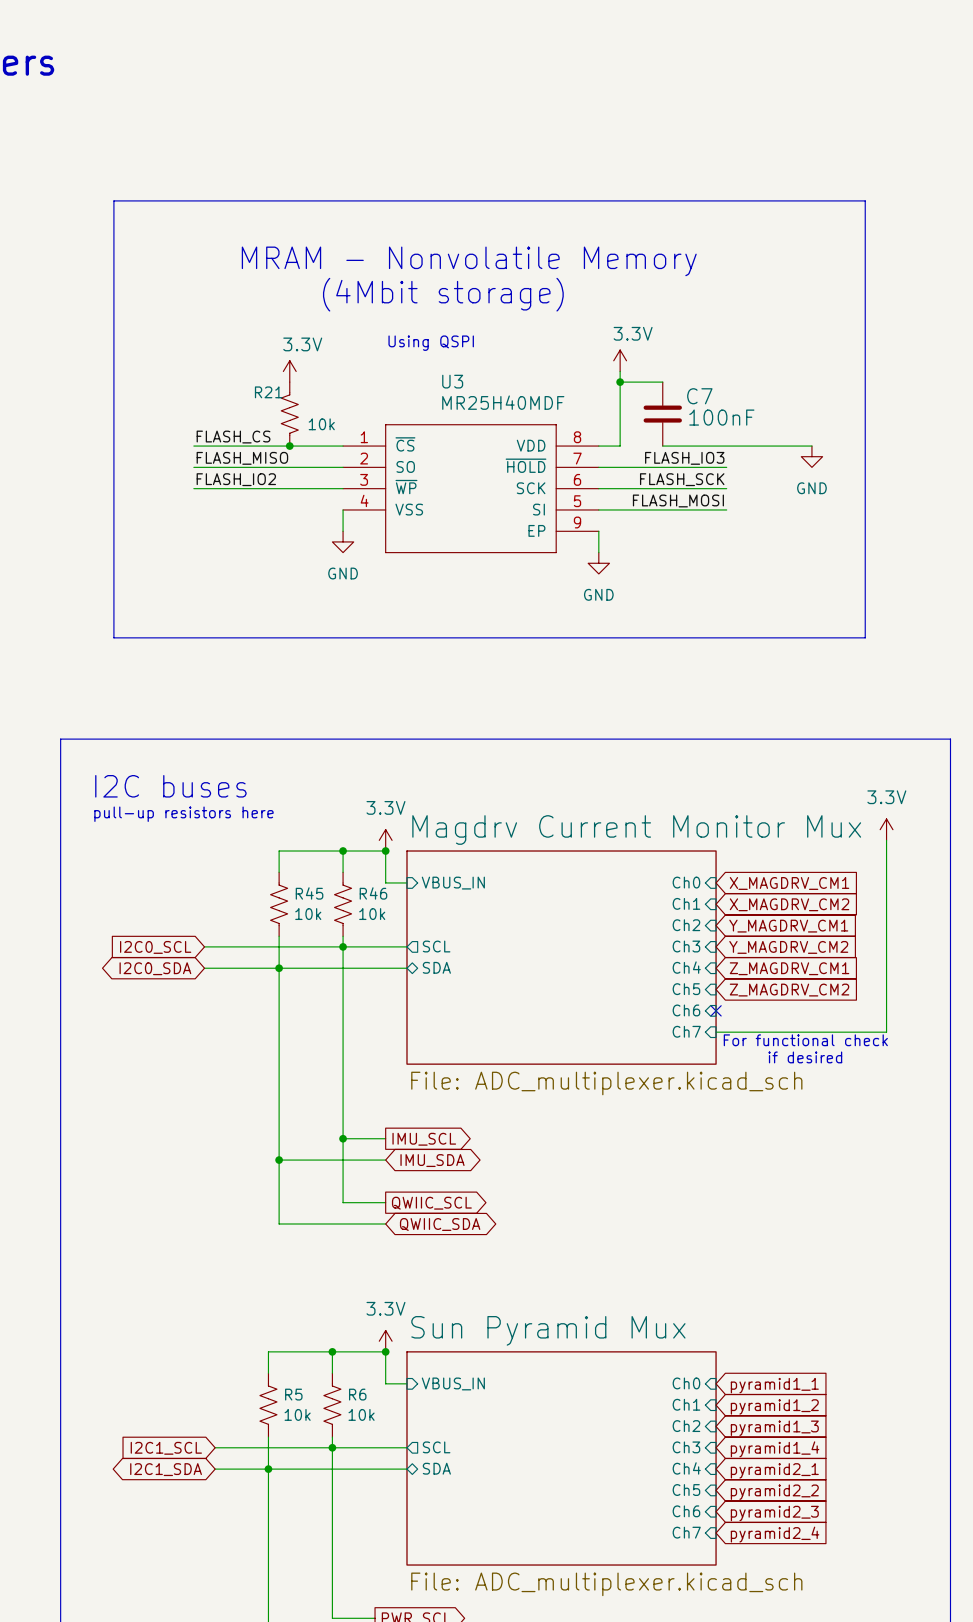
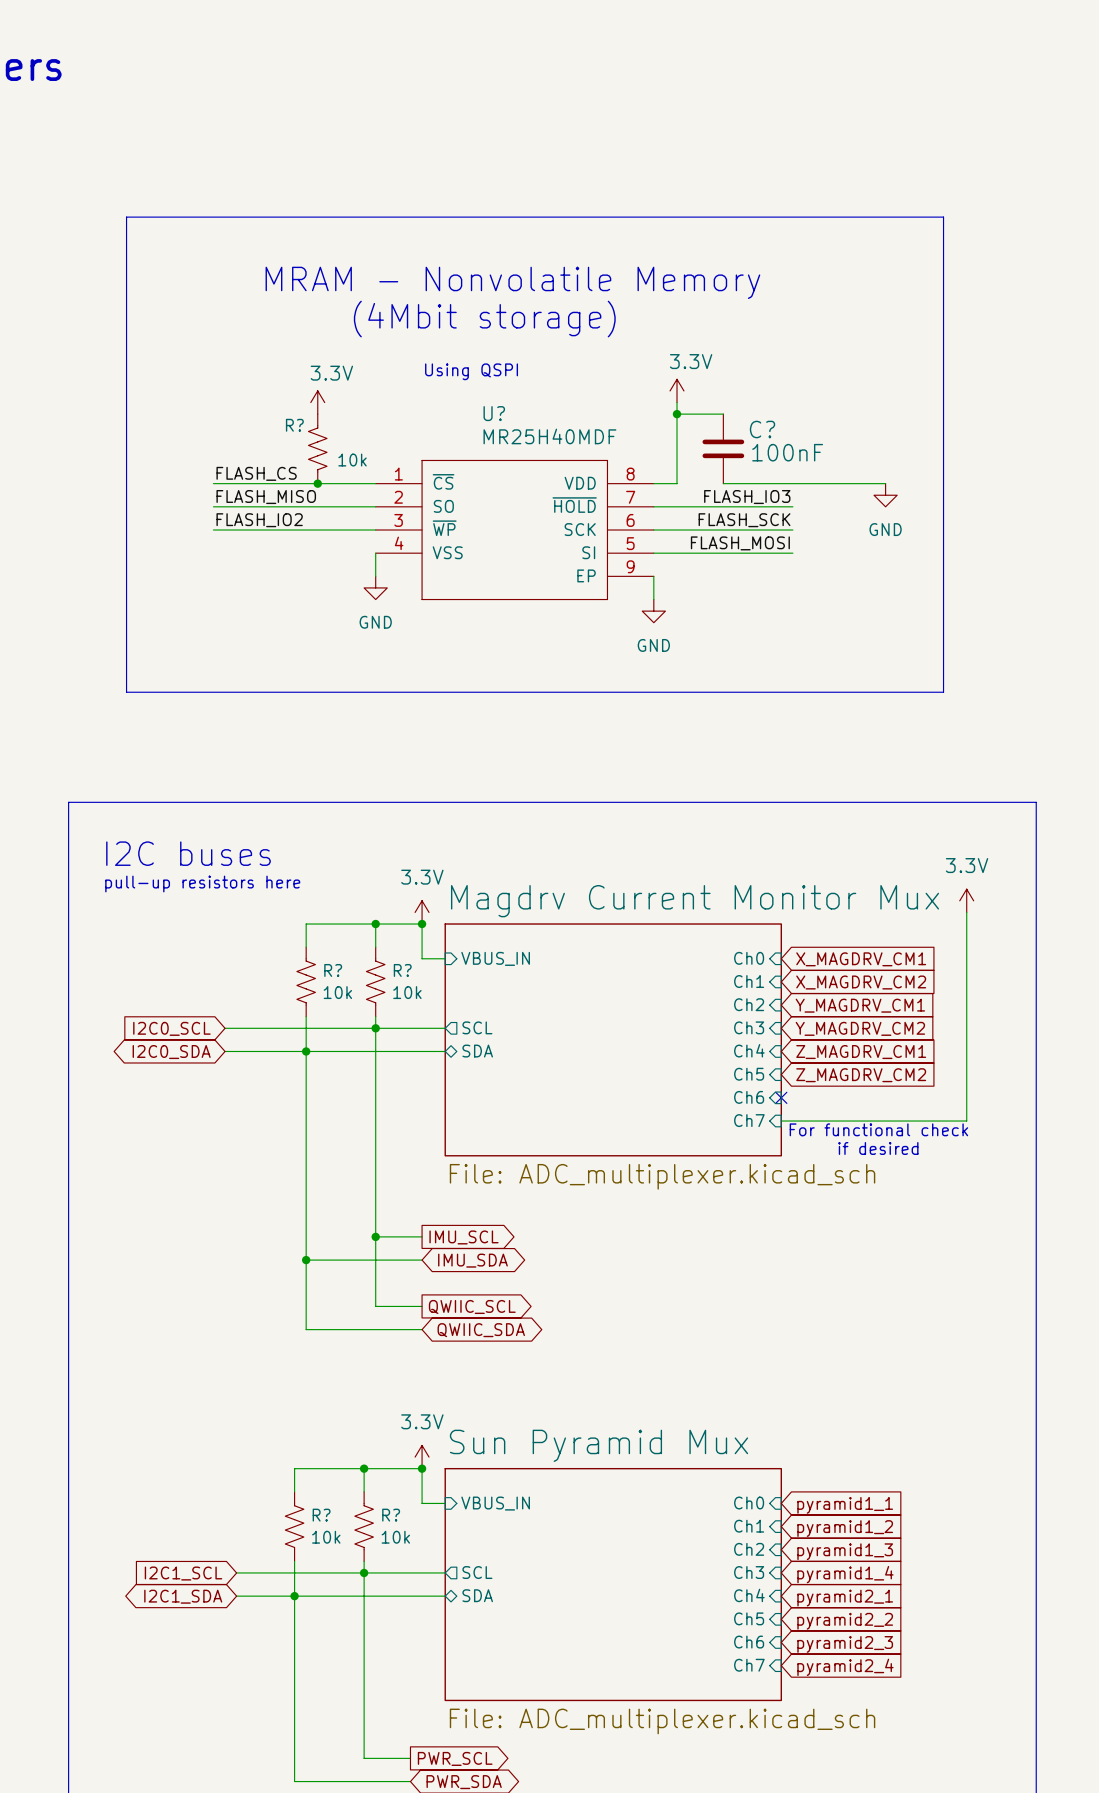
U3 name: U3 (452, 381) -> U? (494, 413)
R21 name: R21 (268, 392) -> R? (294, 425)
C7 name: C7 (699, 396) -> C? (762, 429)
R45 name: R45 (309, 893) -> R? (333, 970)
R46 name: R46 (373, 893) -> R? (402, 970)
R5 name: R5 (293, 1394) -> R? (321, 1515)
R6 name: R6 (357, 1394) -> R? (391, 1515)

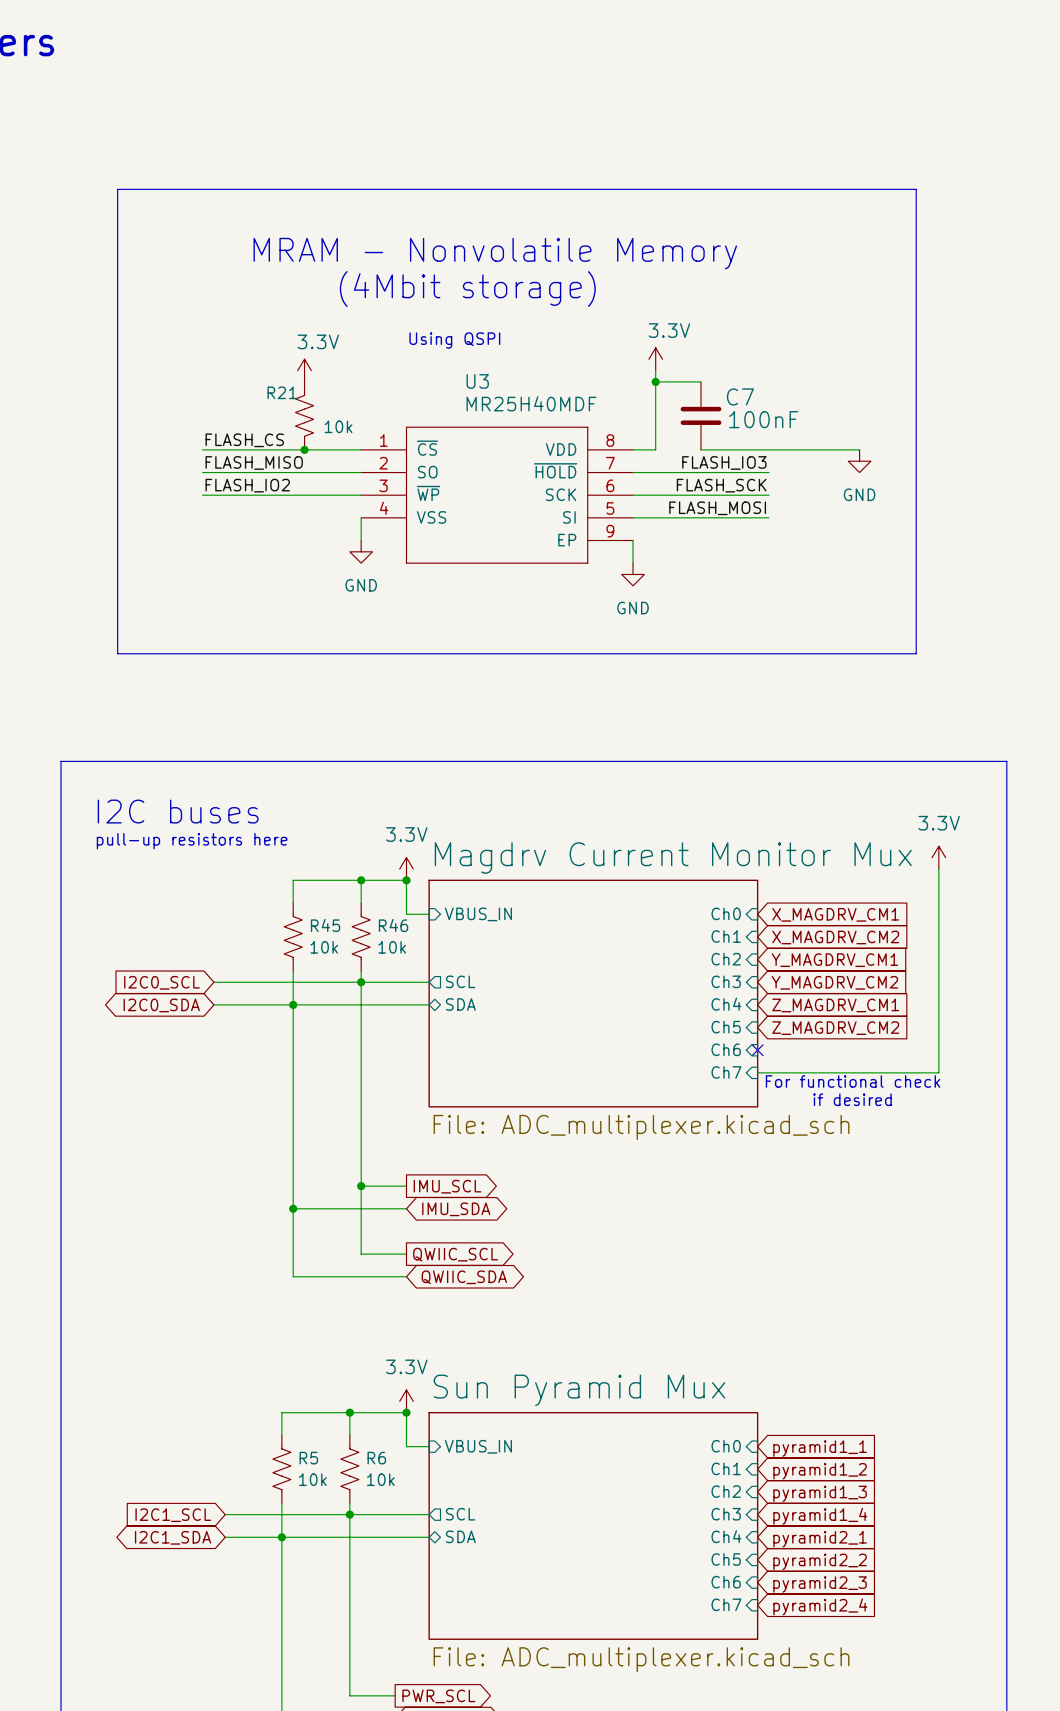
U? name: U? (494, 413) -> U3 (477, 381)
R? name: R? (294, 425) -> R21 (282, 392)
C? name: C? (762, 429) -> C7 (740, 396)
R? name: R? (333, 970) -> R45 (325, 925)
R? name: R? (402, 970) -> R46 (393, 925)
R? name: R? (321, 1515) -> R5 (308, 1458)
R? name: R? (391, 1515) -> R6 (376, 1458)

